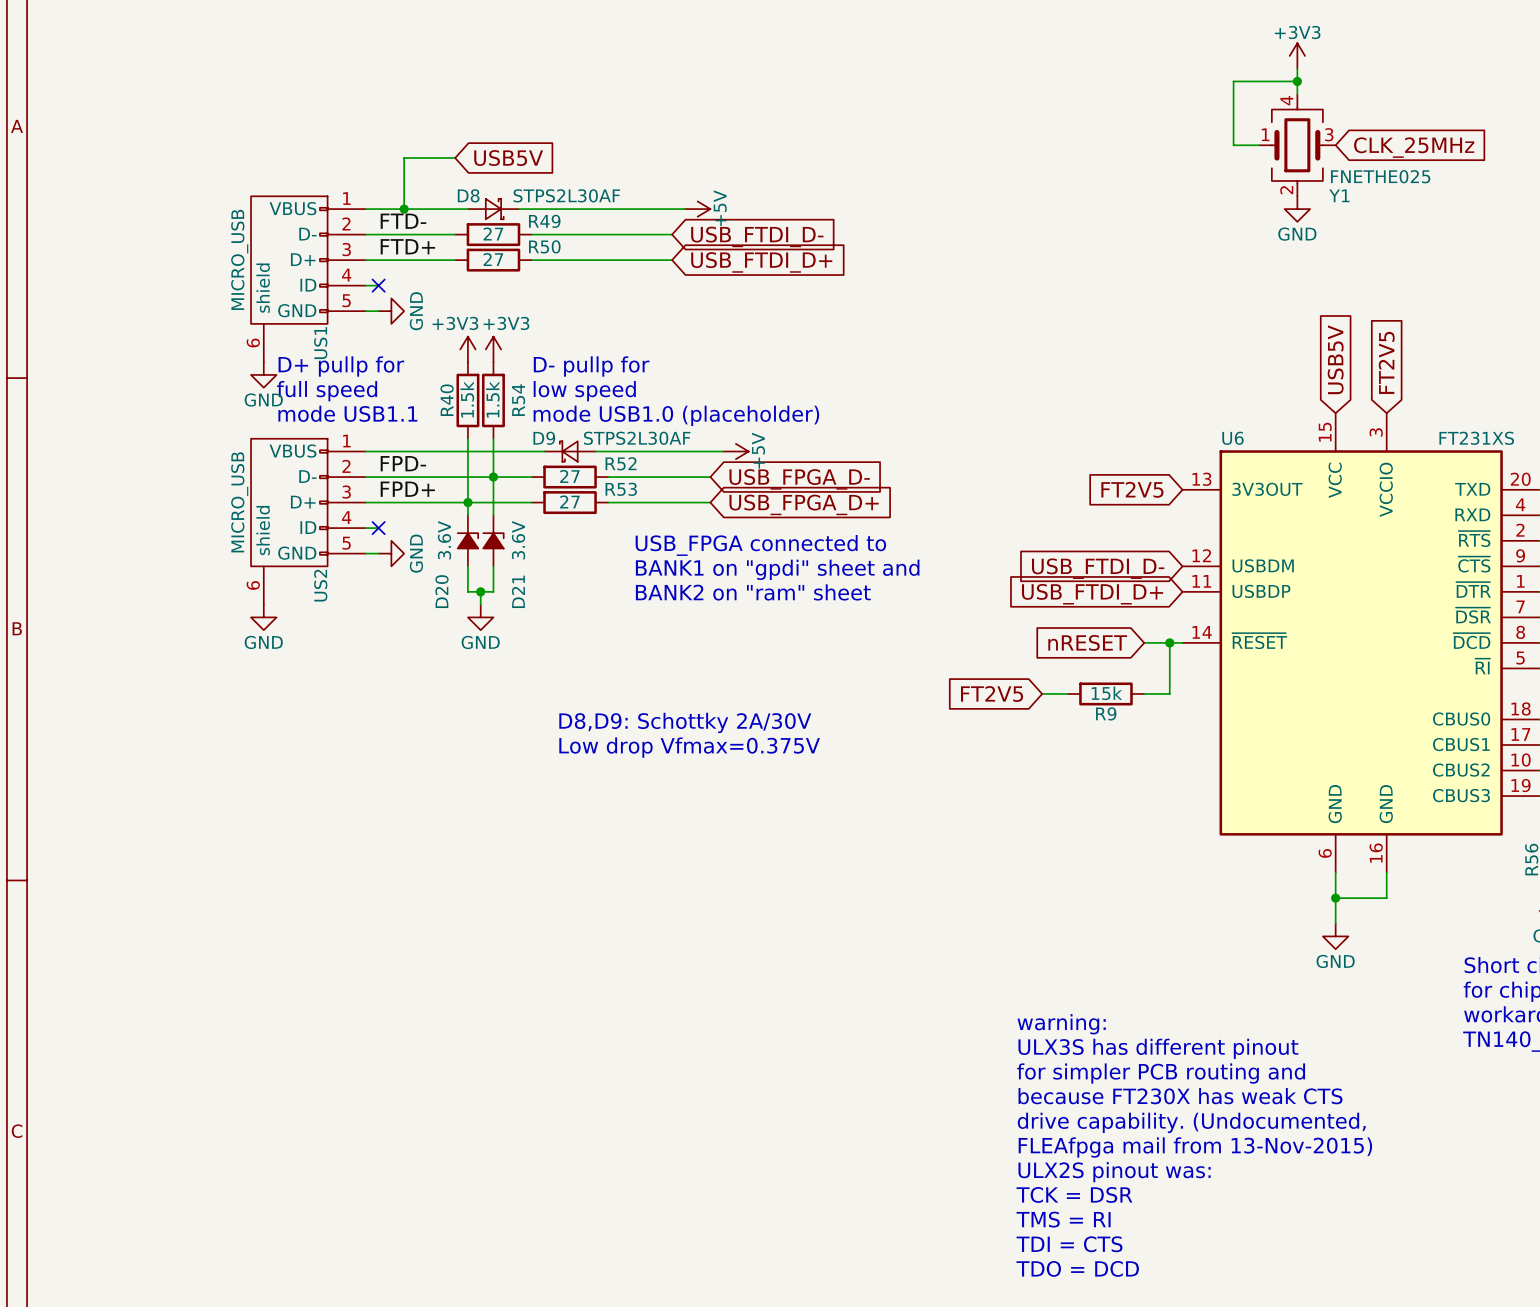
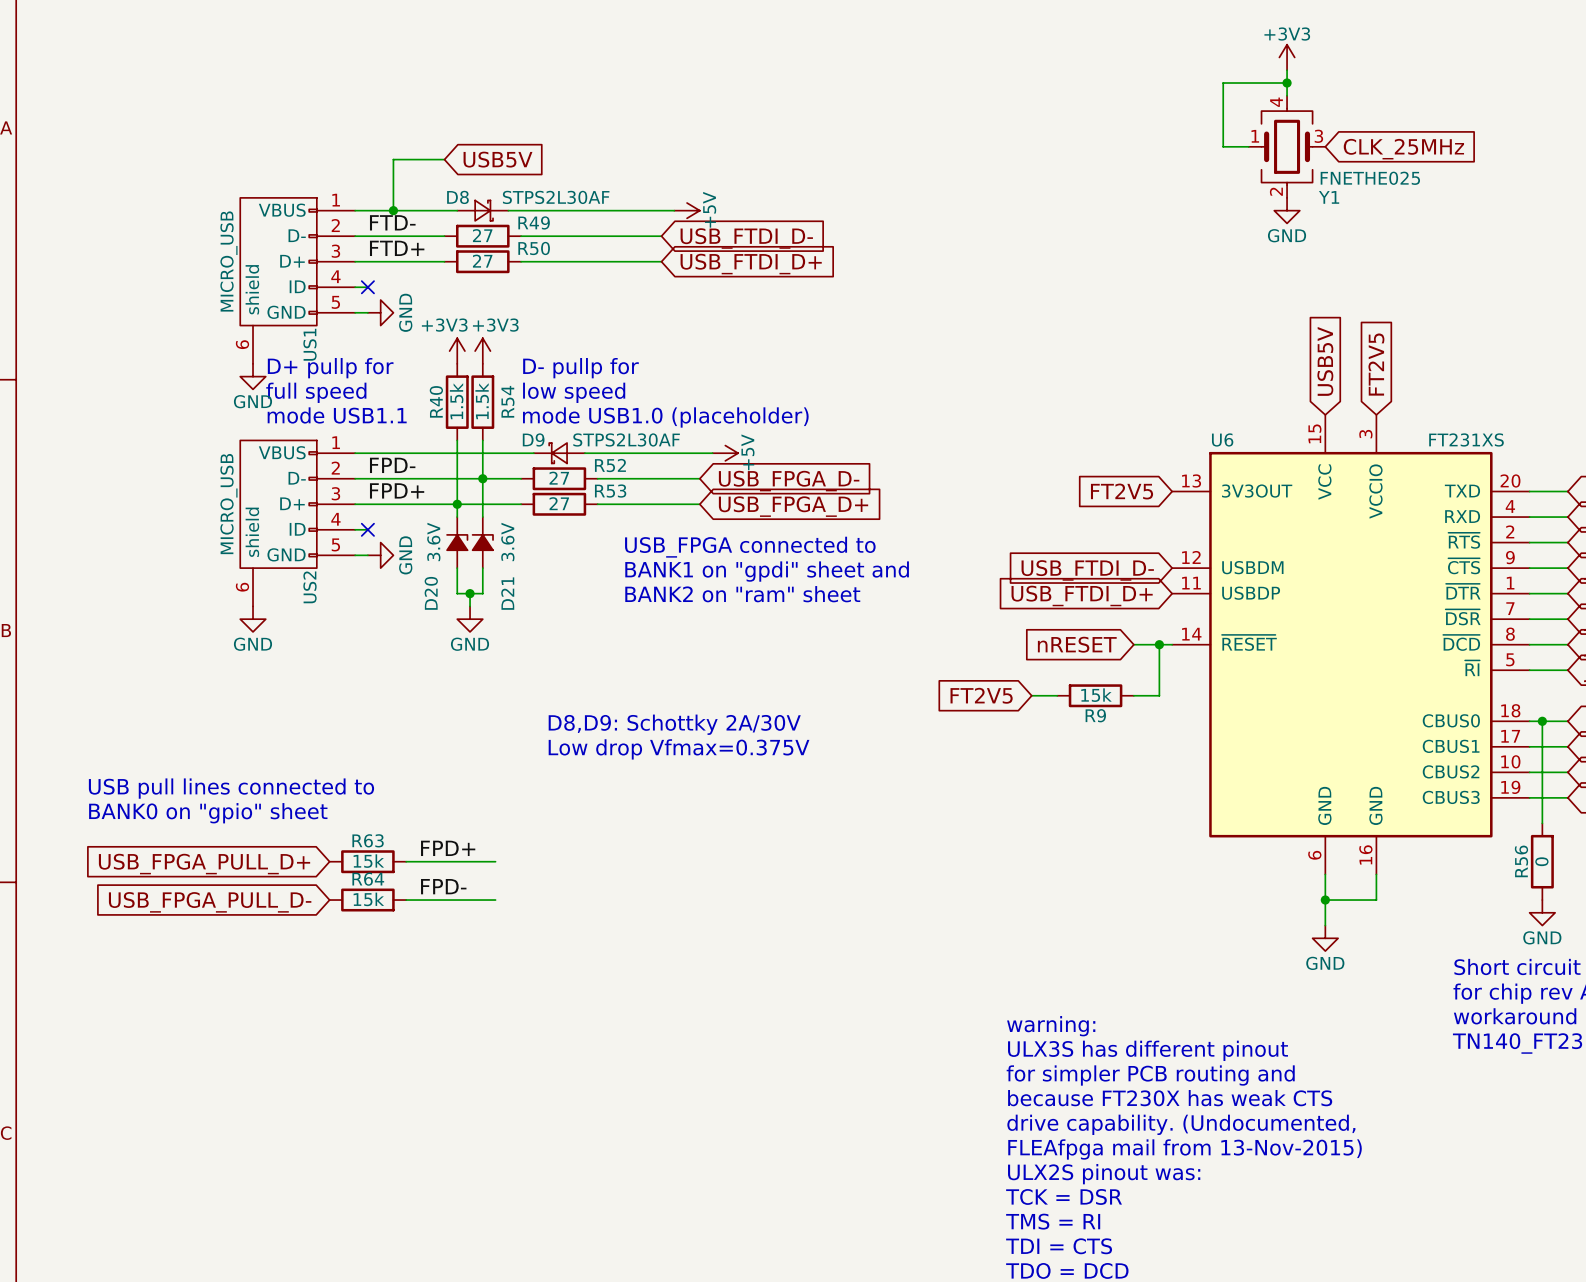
text: none -> USB pull lines connected to (231, 788)
text: none -> BANK0 on "gpio" sheet (208, 813)
label: none -> FPD+ (448, 848)
R63: none -> 15k (367, 861)
wire: none -> (406, 861) (495, 861)
global label: none -> USB_FPGA_PULL_D+ (204, 864)
label: none -> FPD- (443, 886)
R64: none -> 15k (367, 900)
wire: none -> (406, 900) (495, 900)
global label: none -> USB_FPGA_PULL_D- (210, 902)

